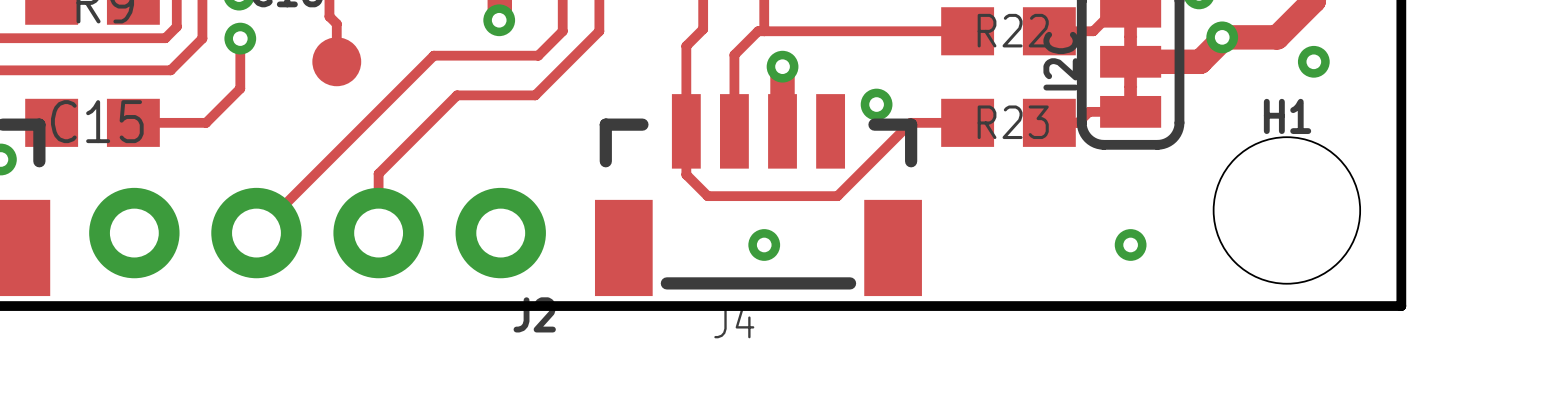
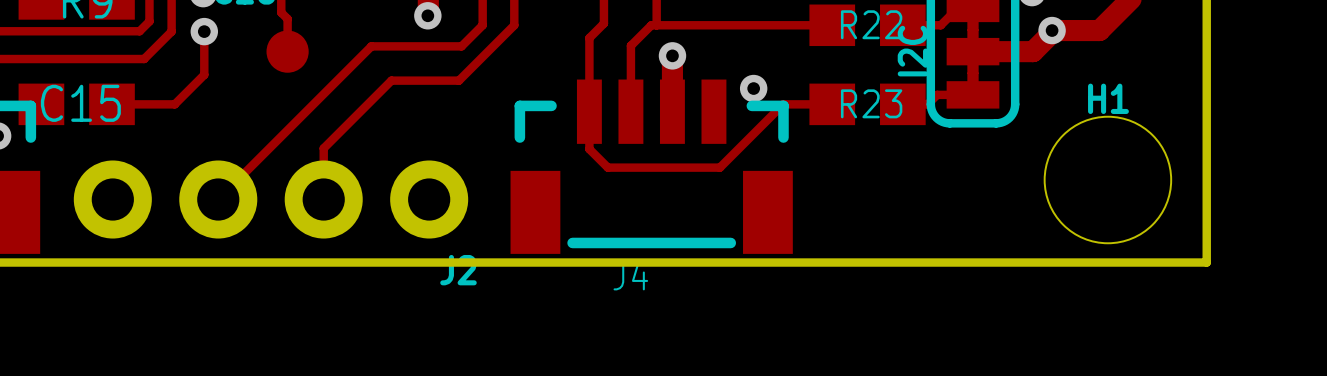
via: (1313, 61) -> none
via: (764, 244) -> none
via: (1130, 244) -> none

